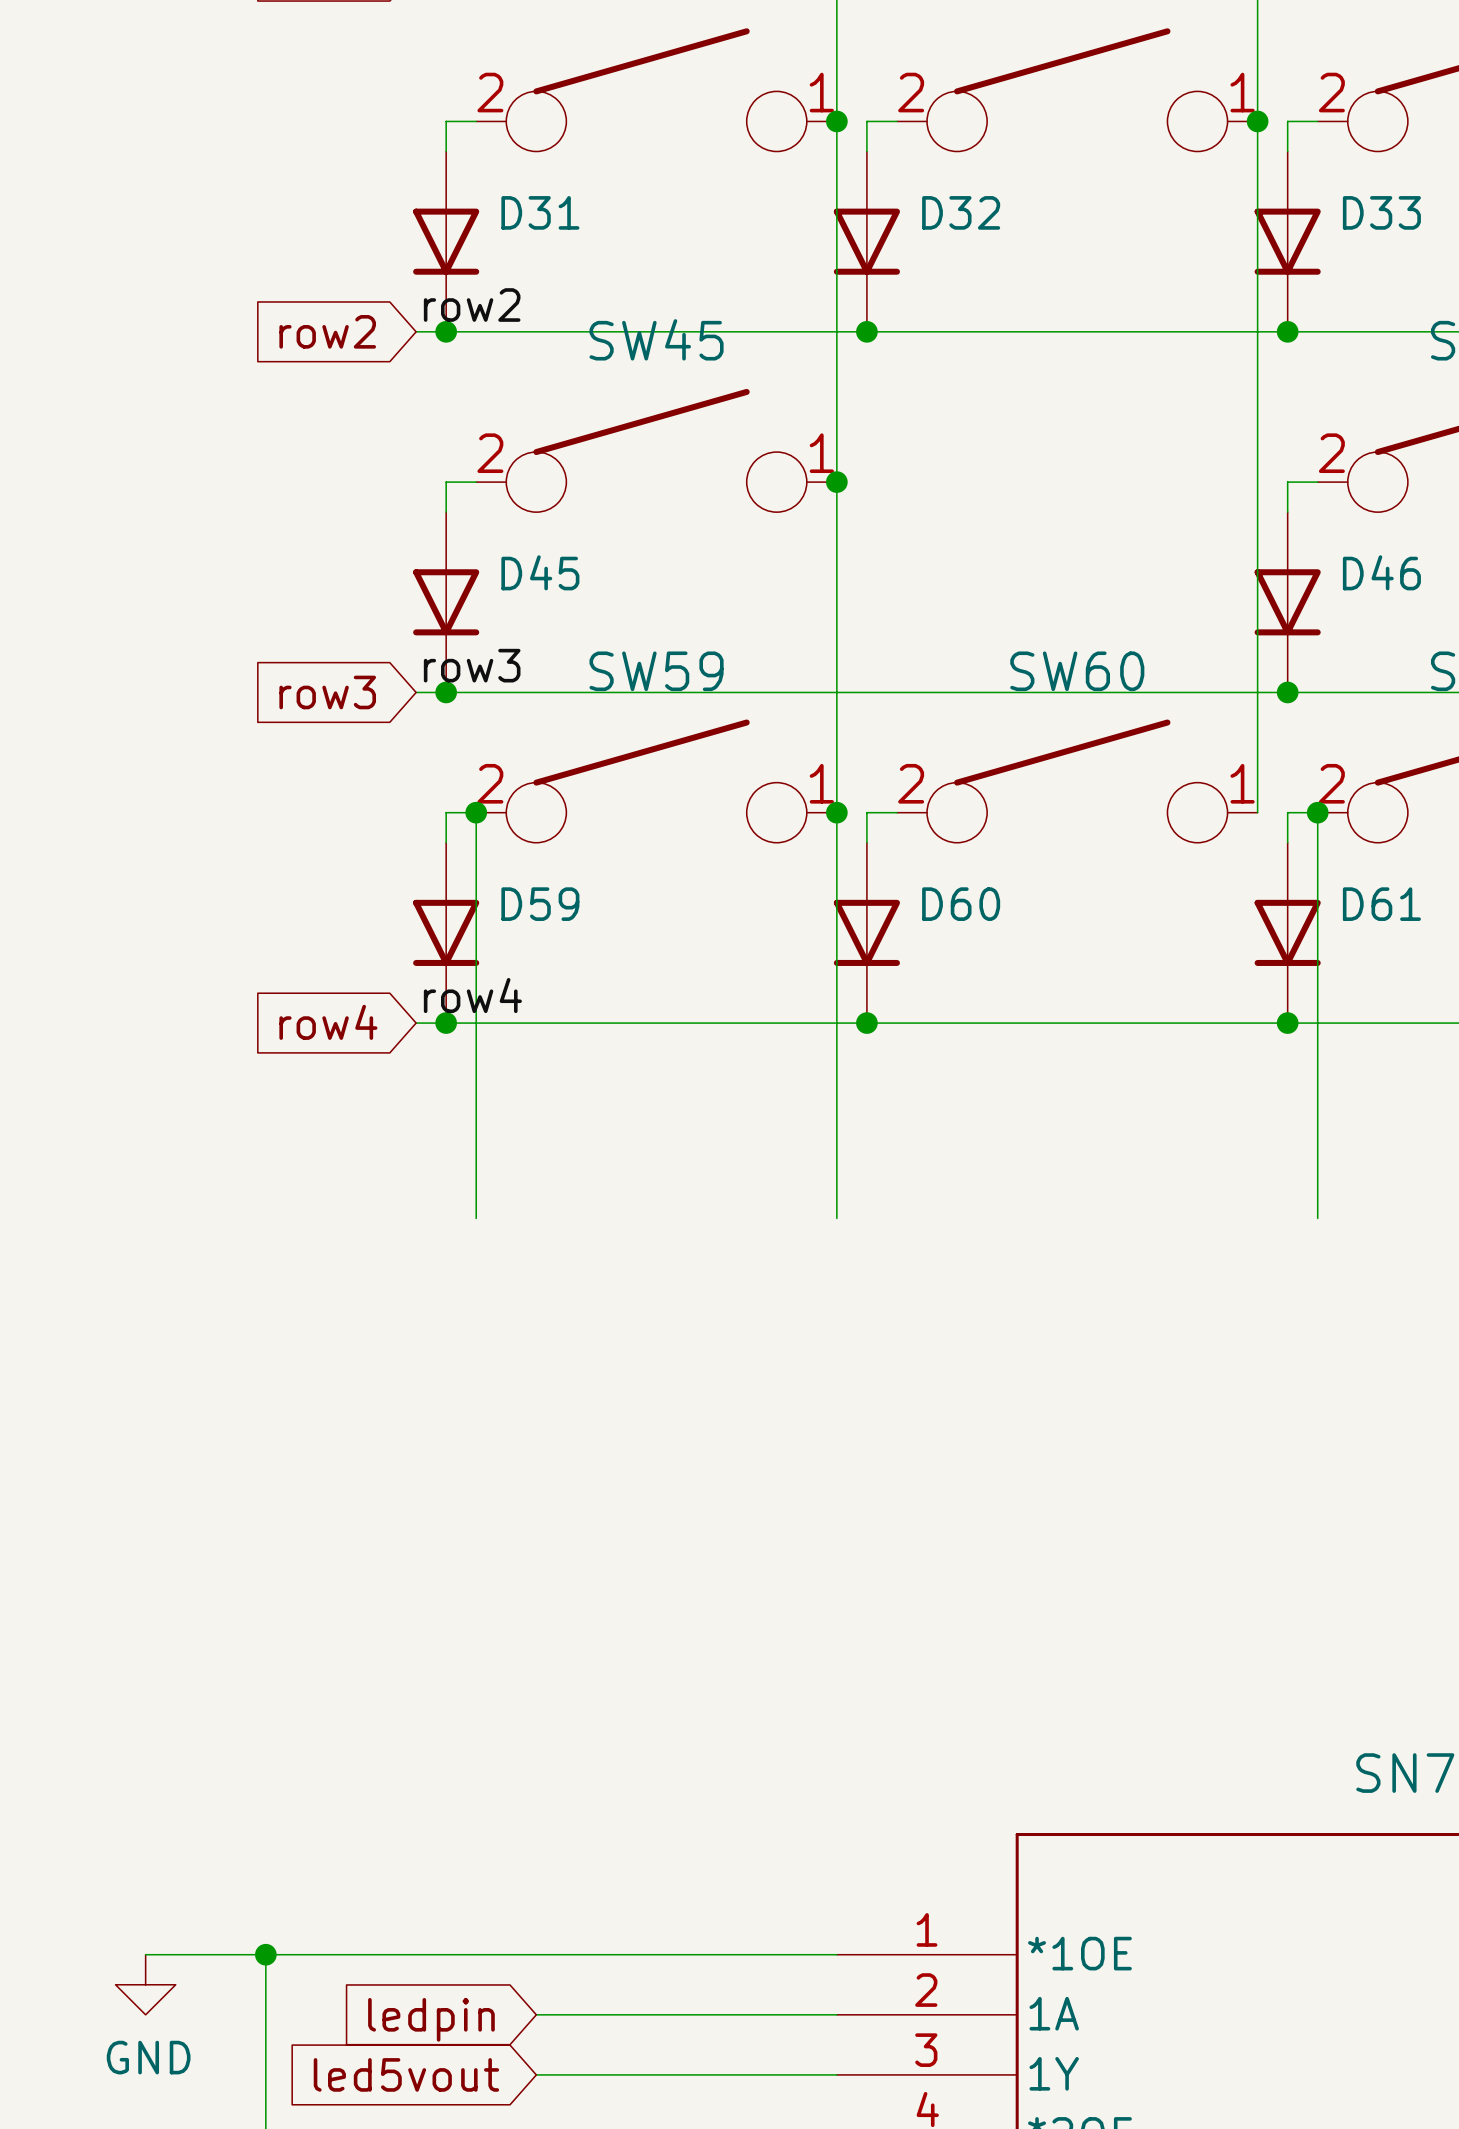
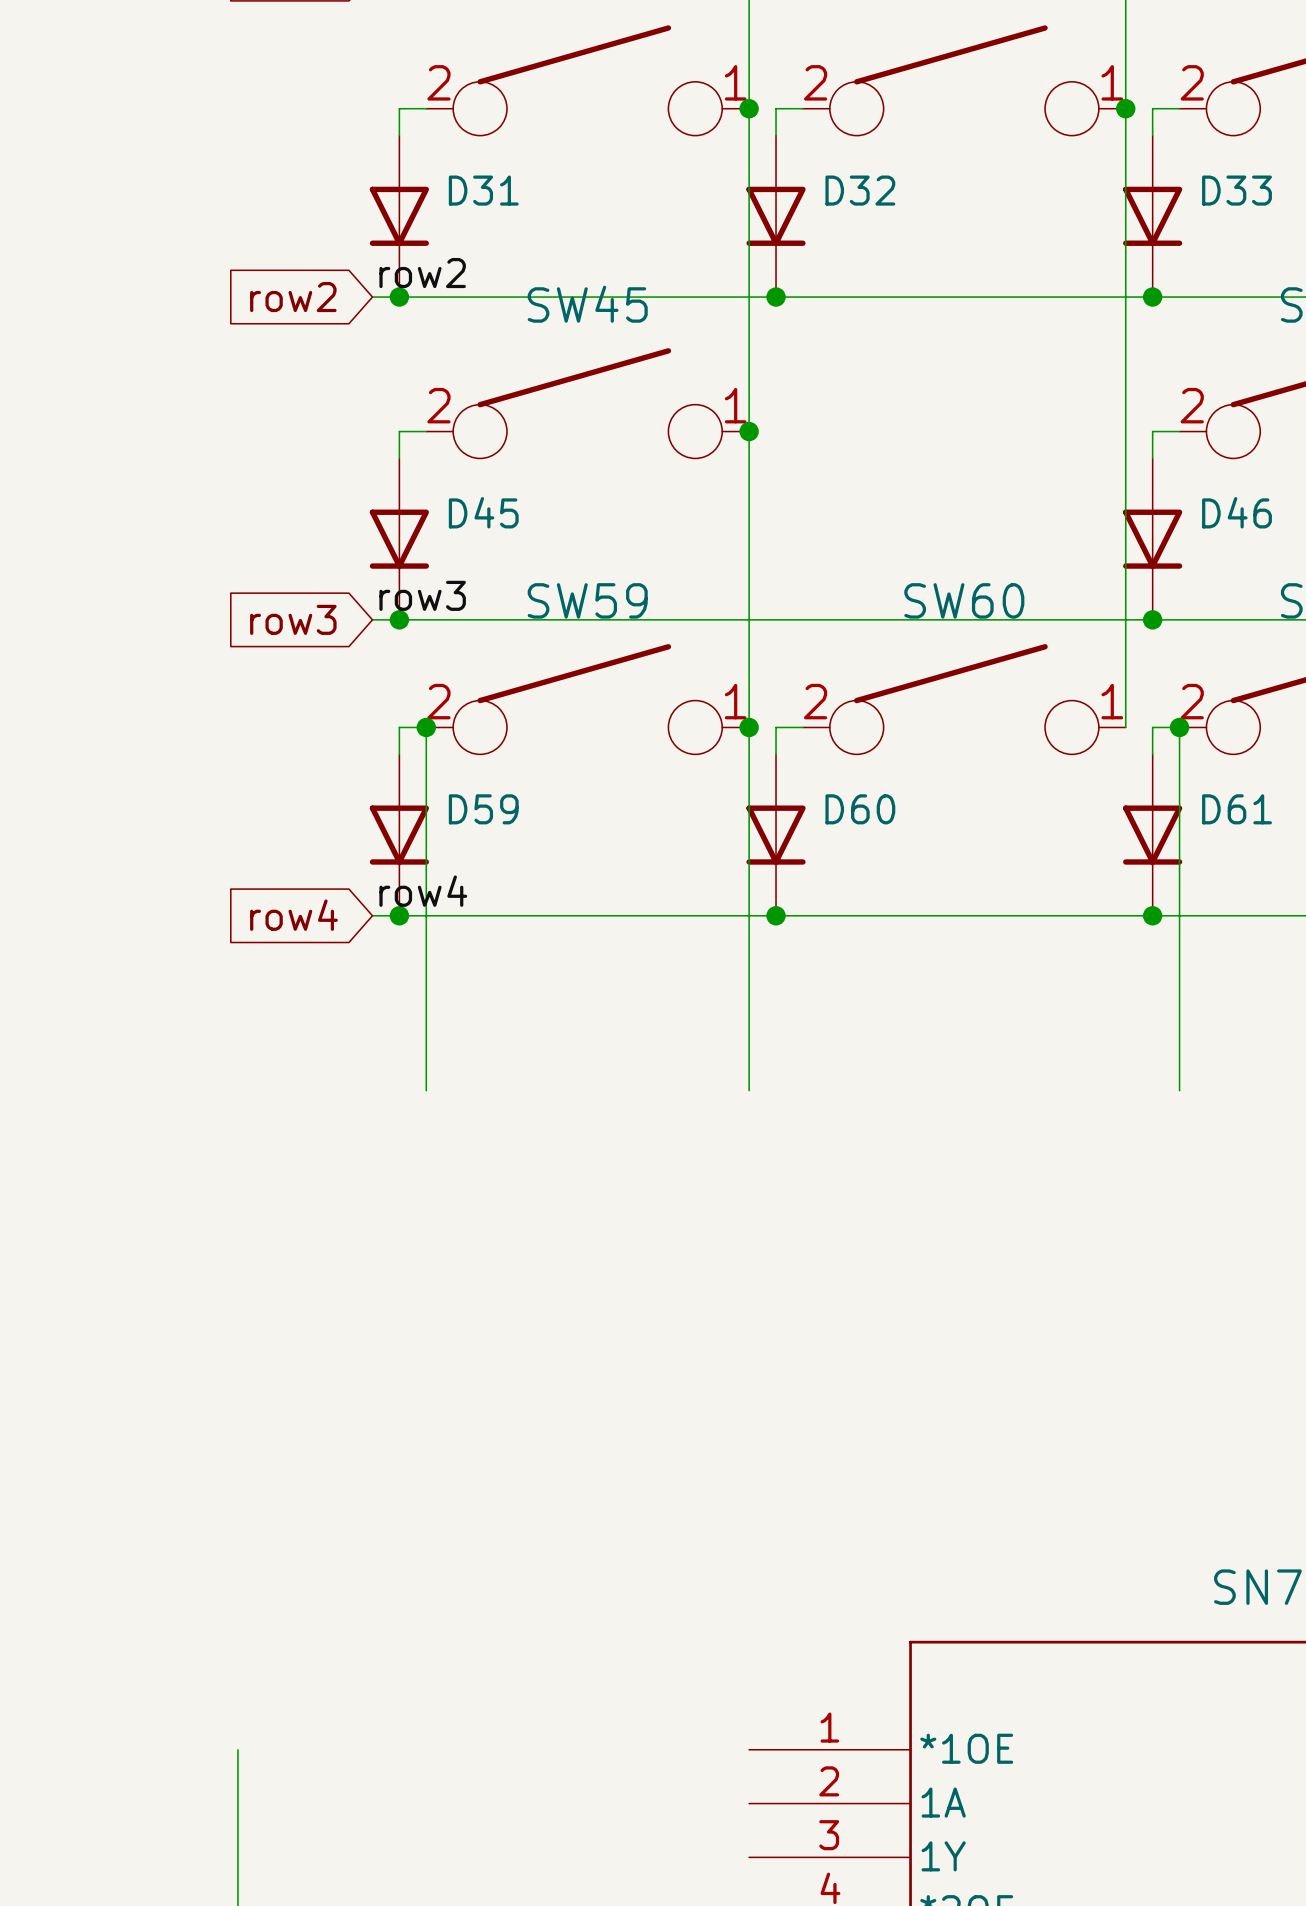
wire: (145, 1954) (836, 1954) -> none
junction: (265, 1954) -> none
power symbol: GND (145, 1984) -> none
wire: (536, 2014) (836, 2014) -> none
global label: ledpin (431, 2019) -> none
global label: led5vout (406, 2074) -> none
wire: (536, 2074) (836, 2074) -> none

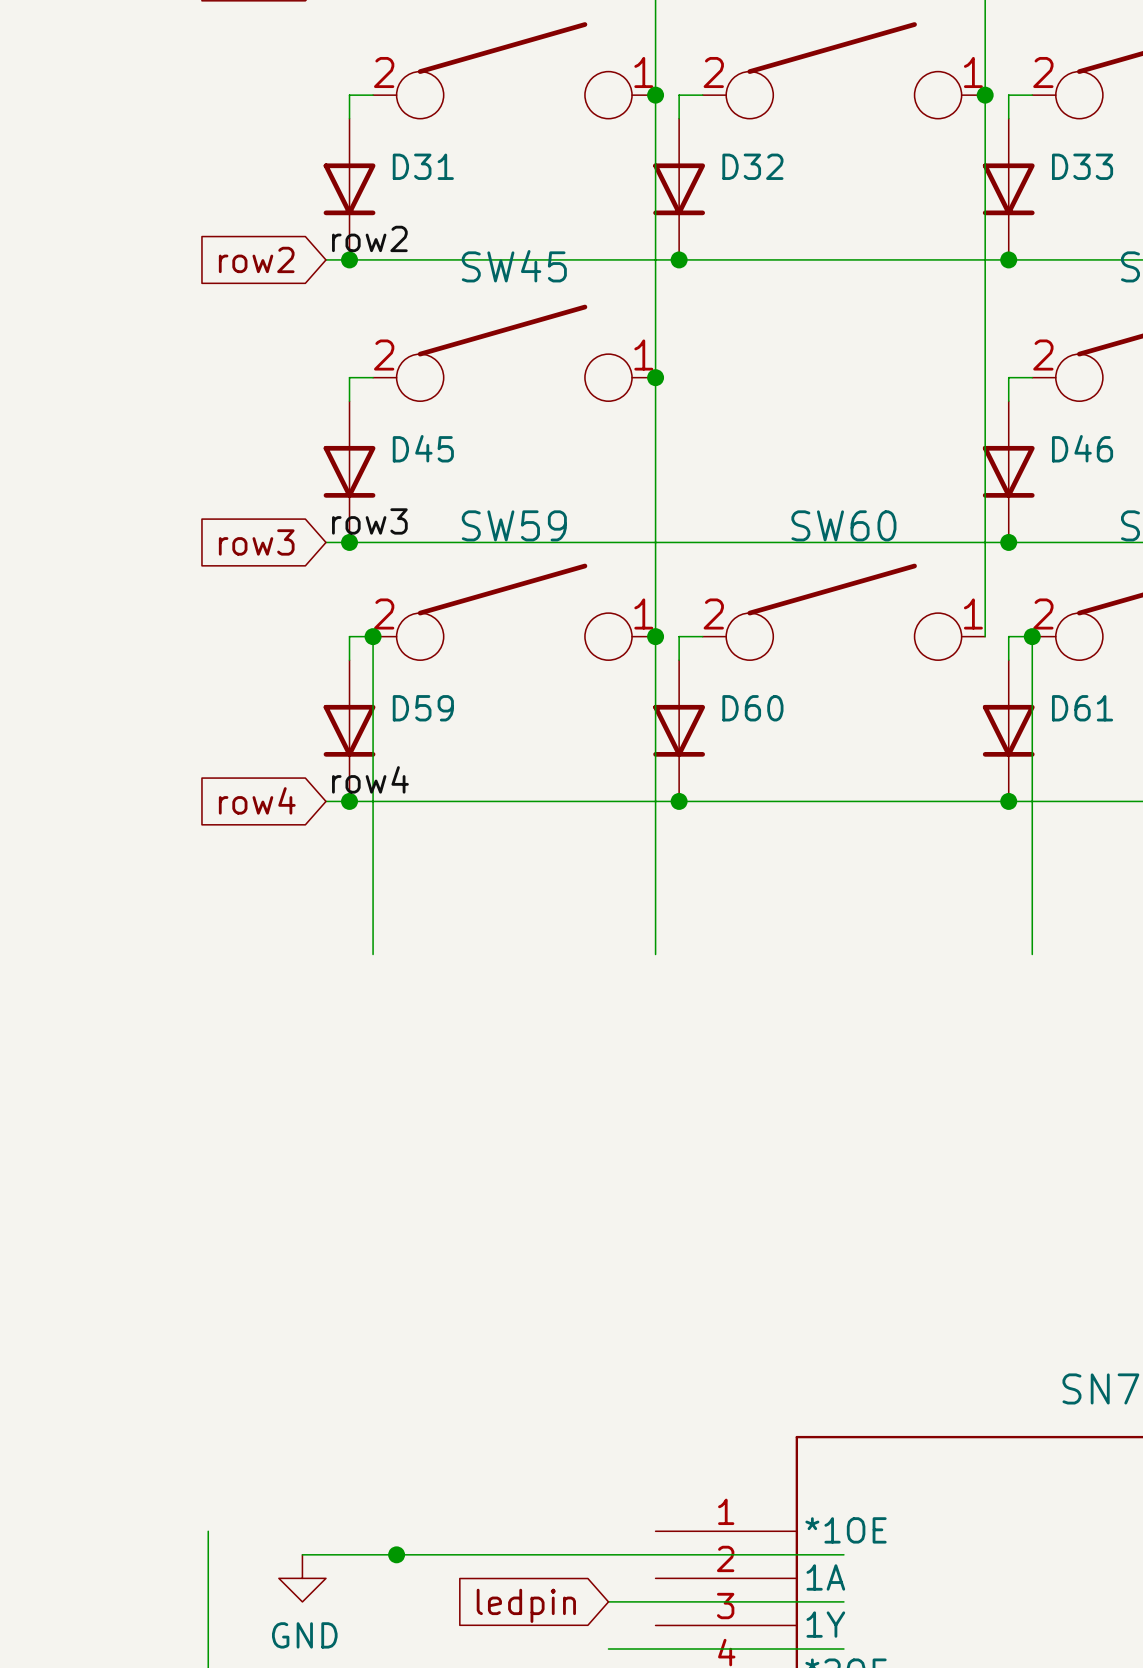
wire: none -> (302, 1554) (843, 1554)
junction: none -> (396, 1554)
power symbol: none -> GND (302, 1578)
wire: none -> (608, 1601) (843, 1601)
global label: none -> ledpin (526, 1605)
wire: none -> (608, 1648) (843, 1648)

